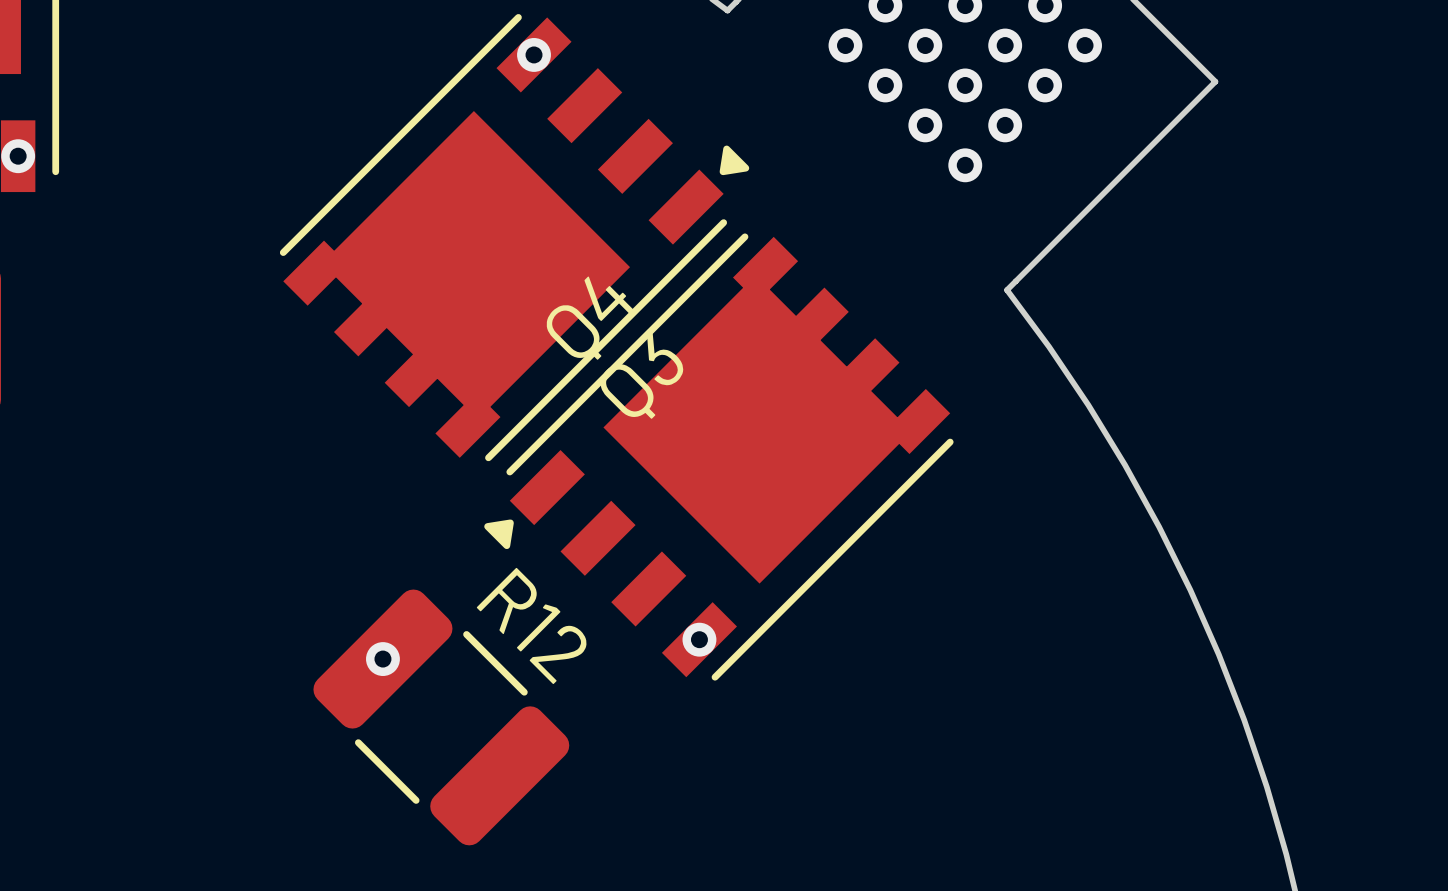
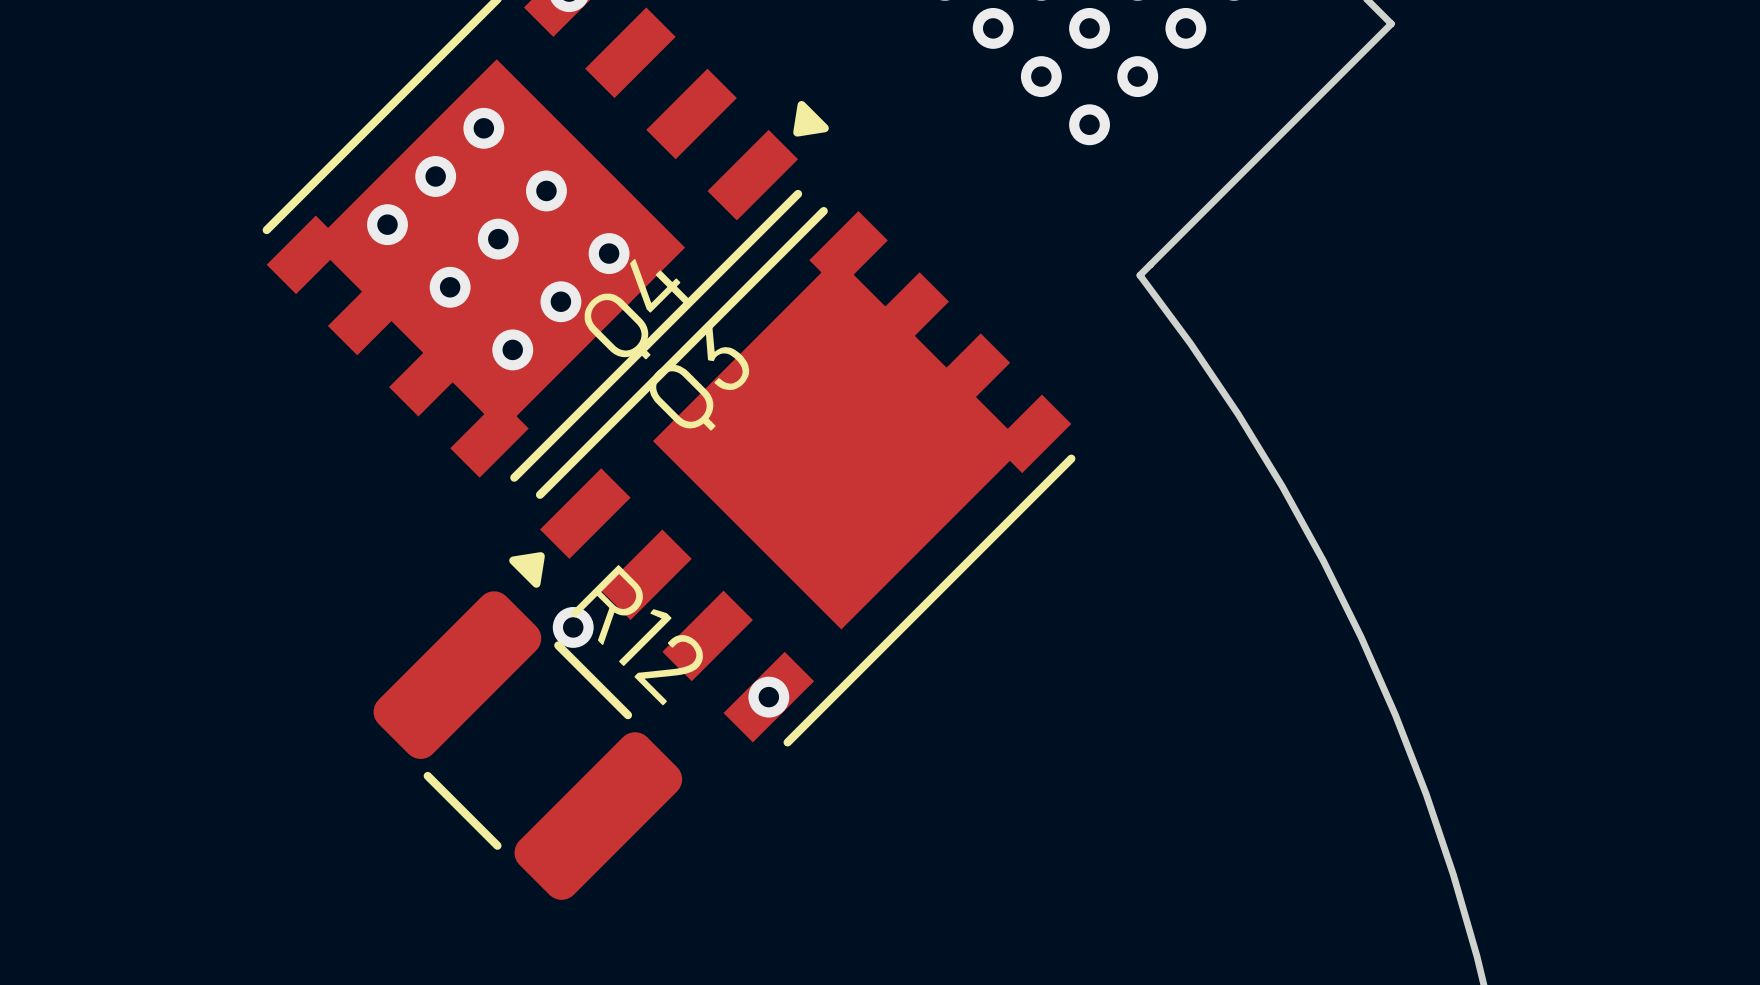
via: none -> (483, 128)
via: none -> (435, 176)
via: none -> (546, 190)
via: none -> (387, 224)
via: none -> (498, 239)
via: none -> (609, 253)
via: none -> (450, 287)
via: none -> (560, 301)
via: none -> (512, 349)
via: none -> (573, 627)
via: (382, 659) -> none
R12 position: (441, 717) -> (527, 745)

